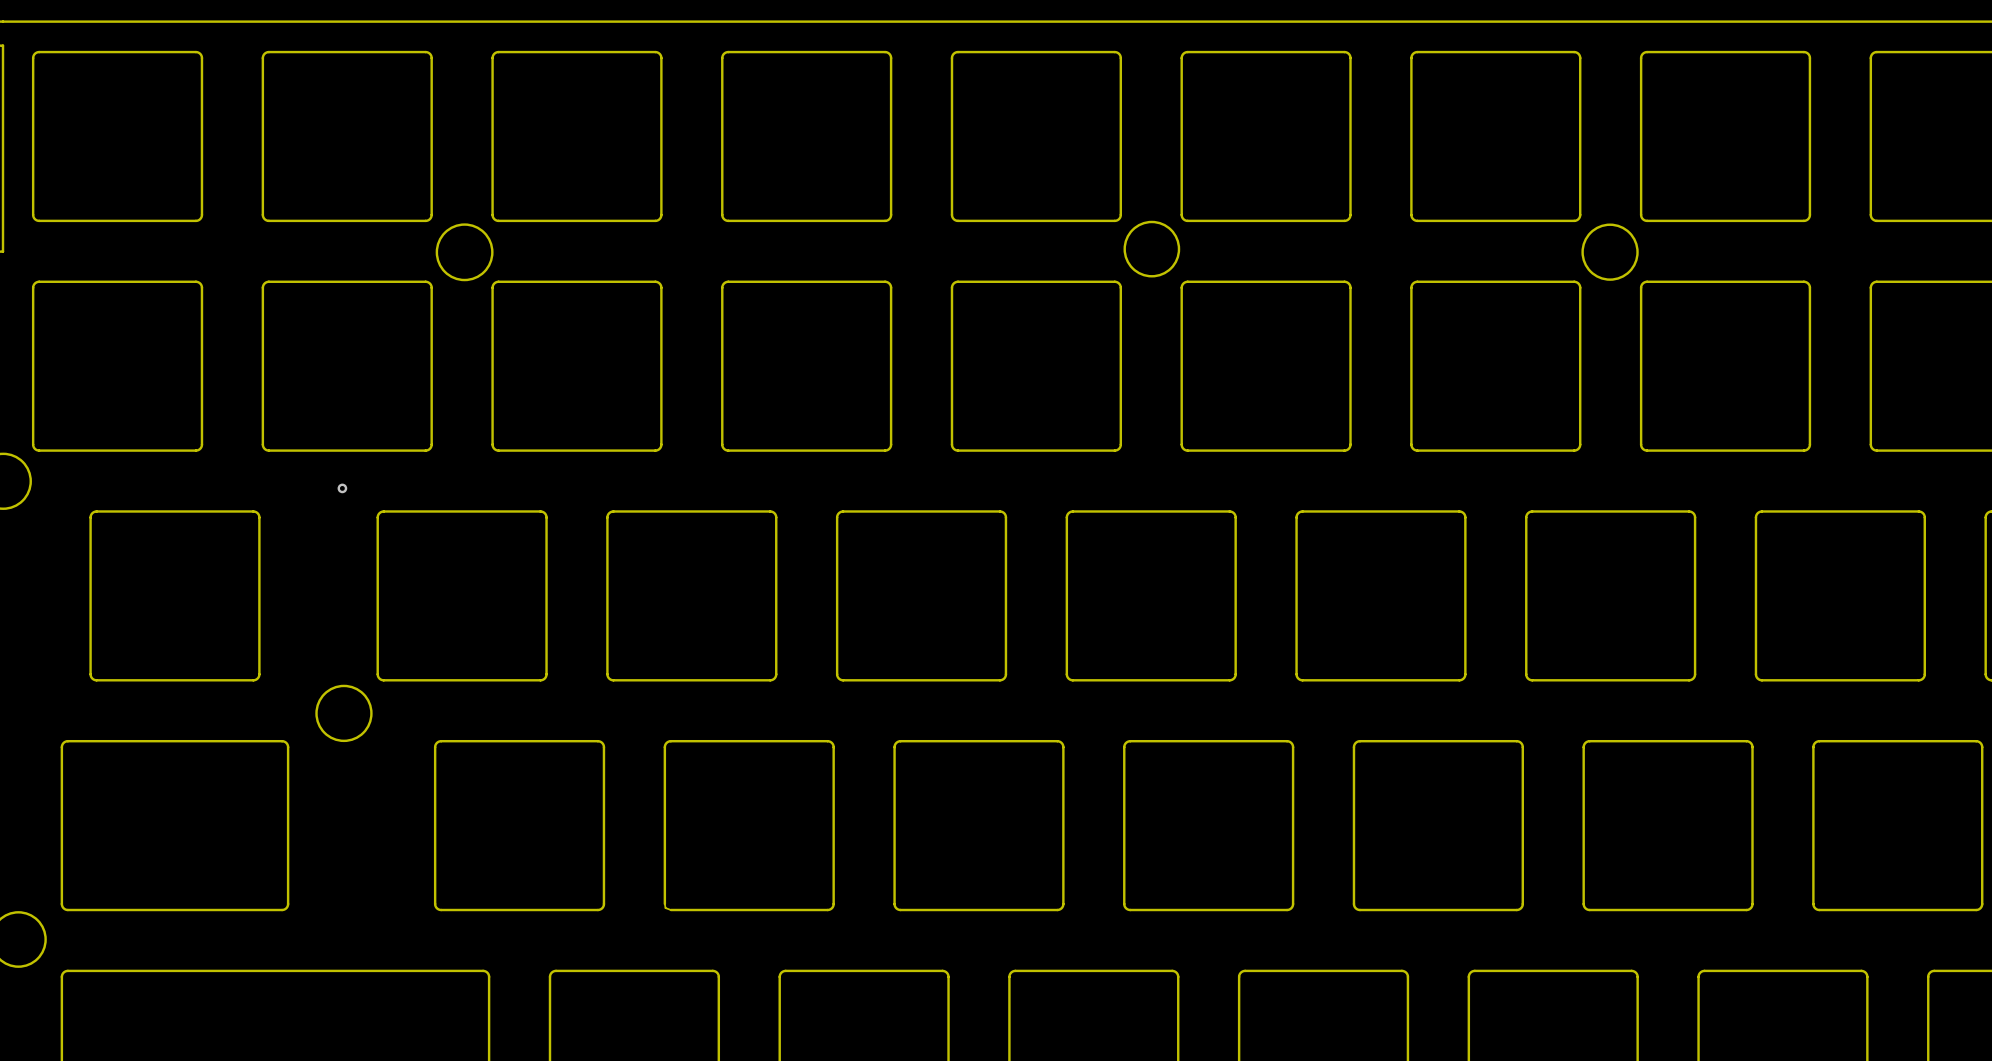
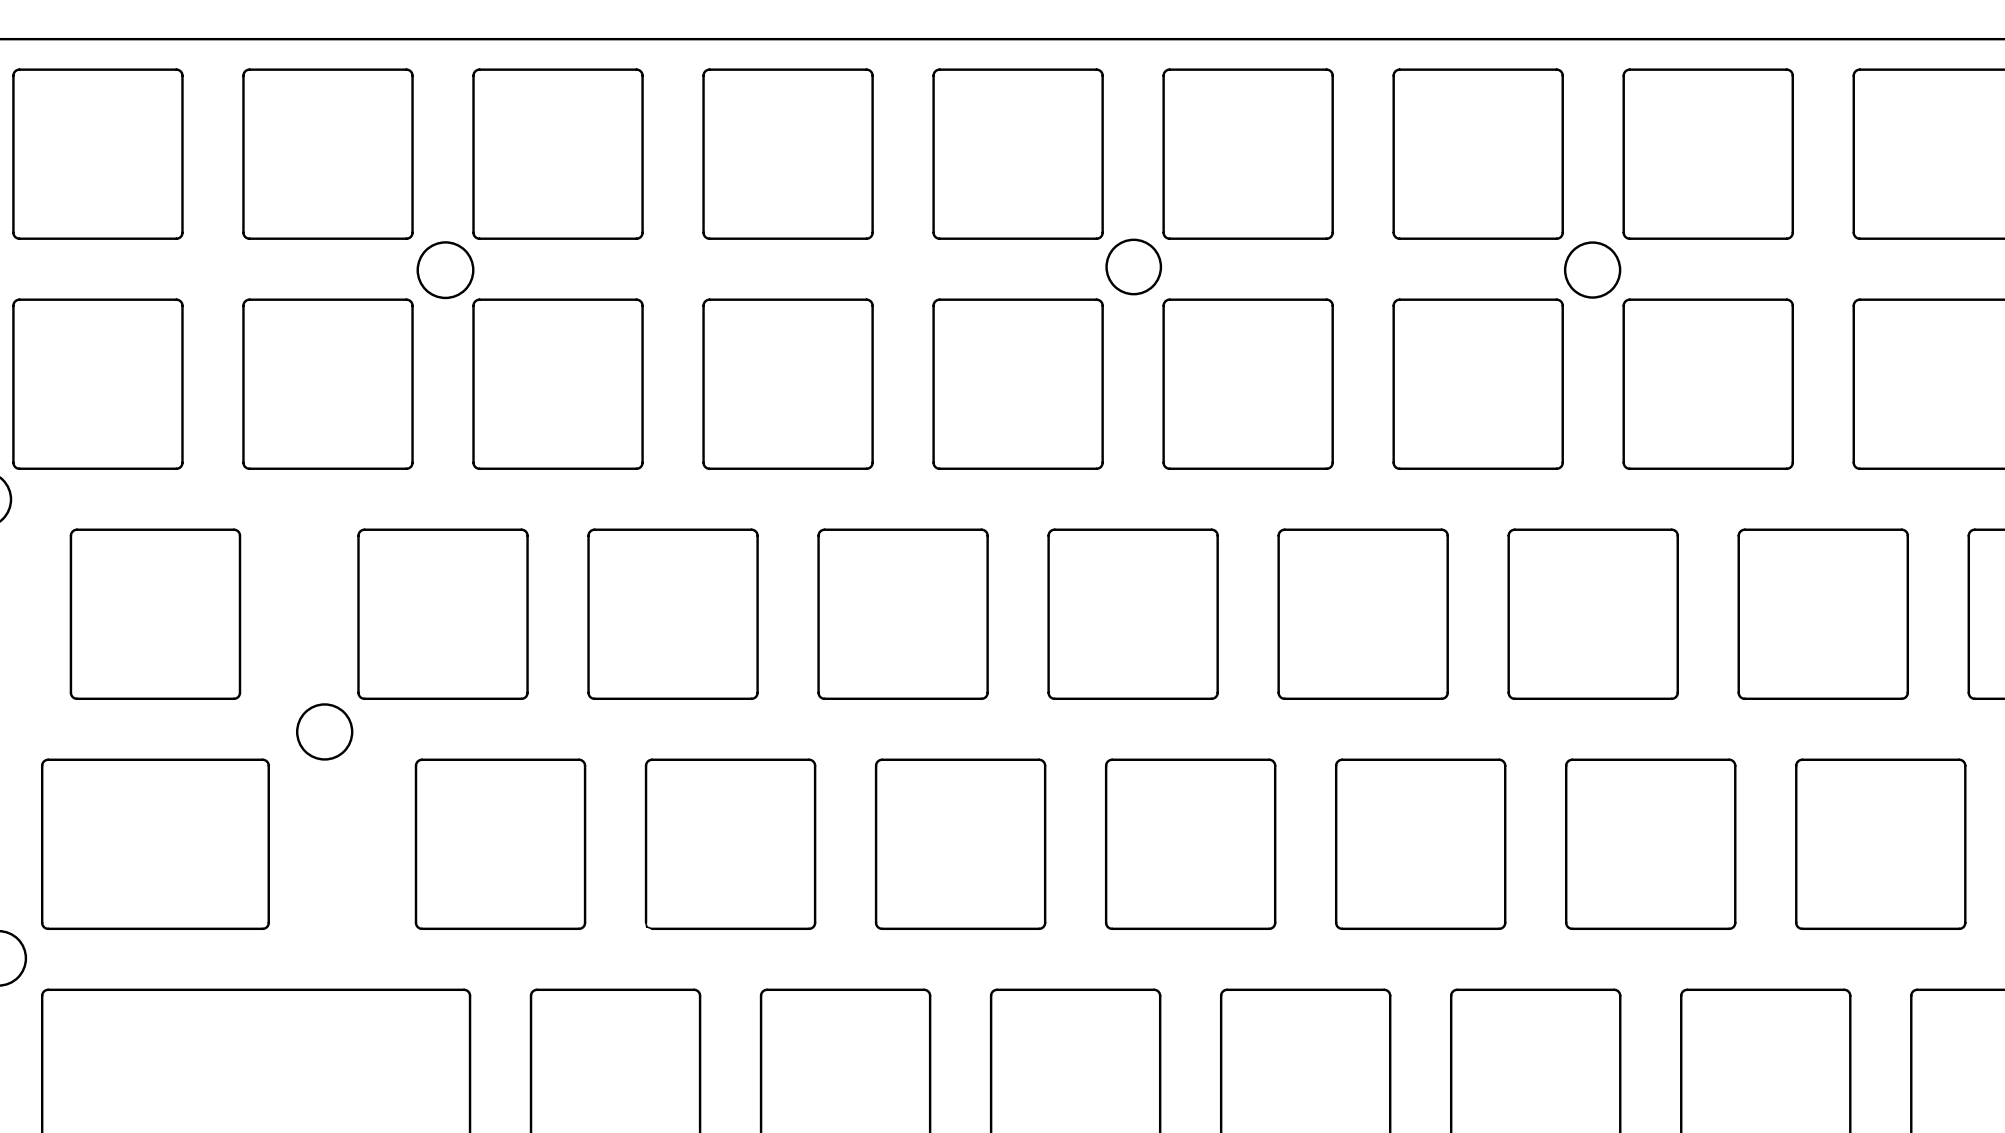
via: (342, 488) -> none

